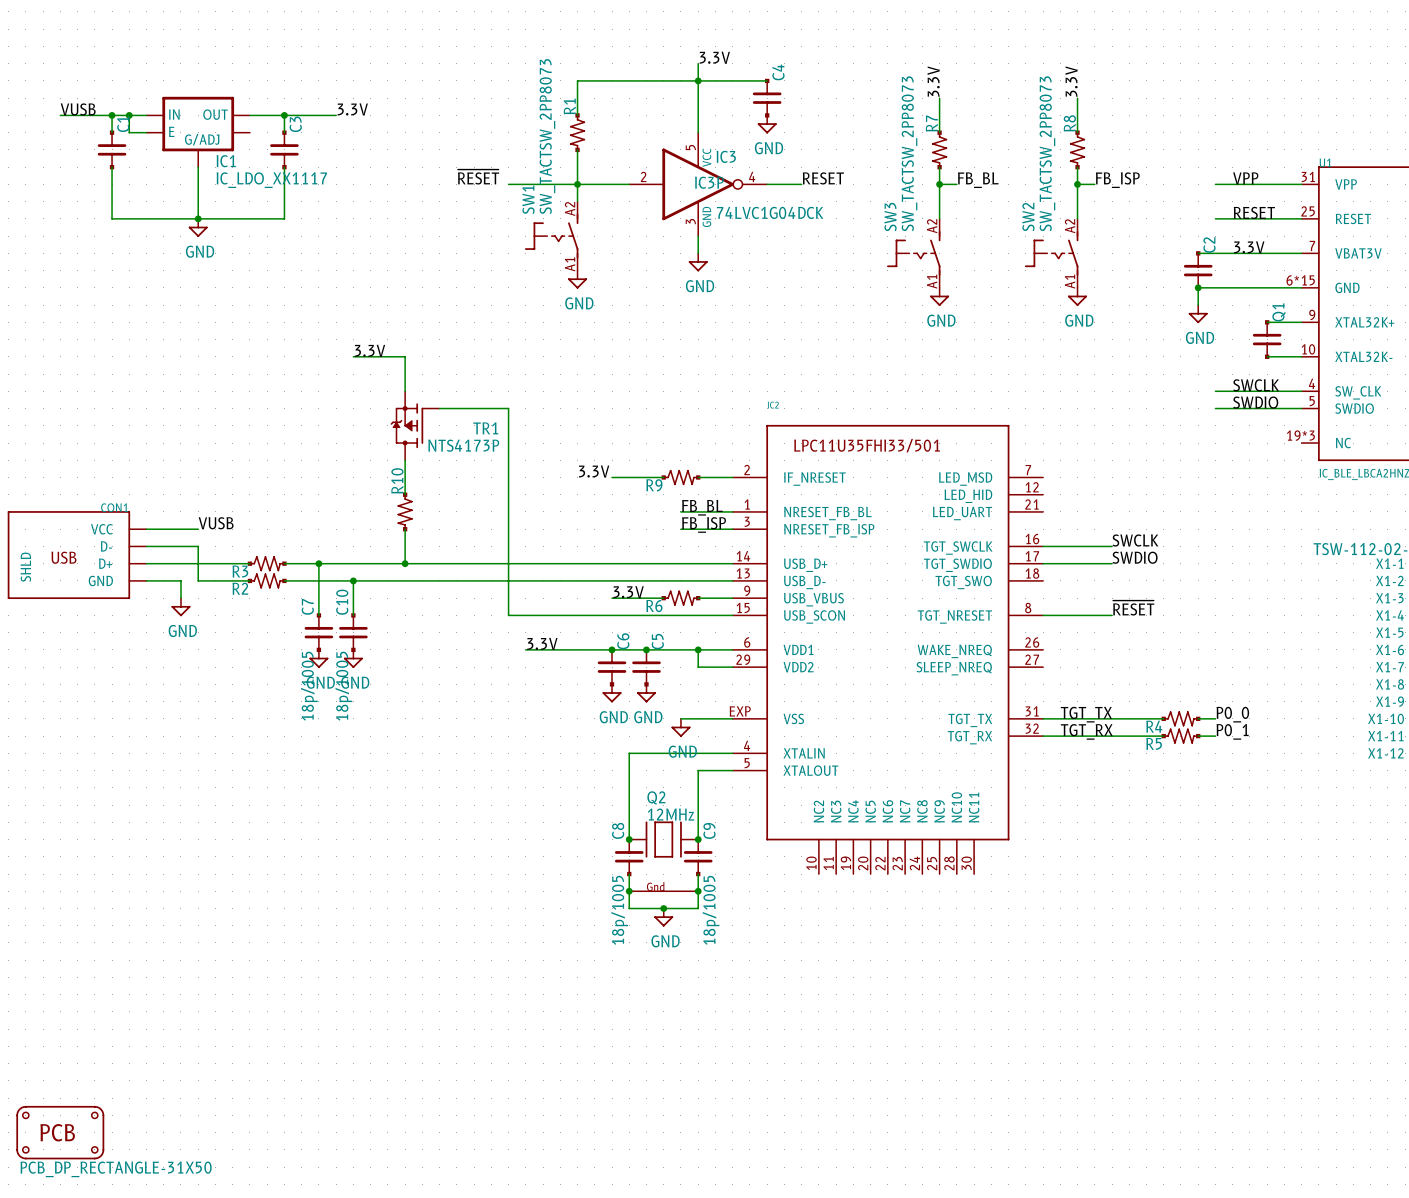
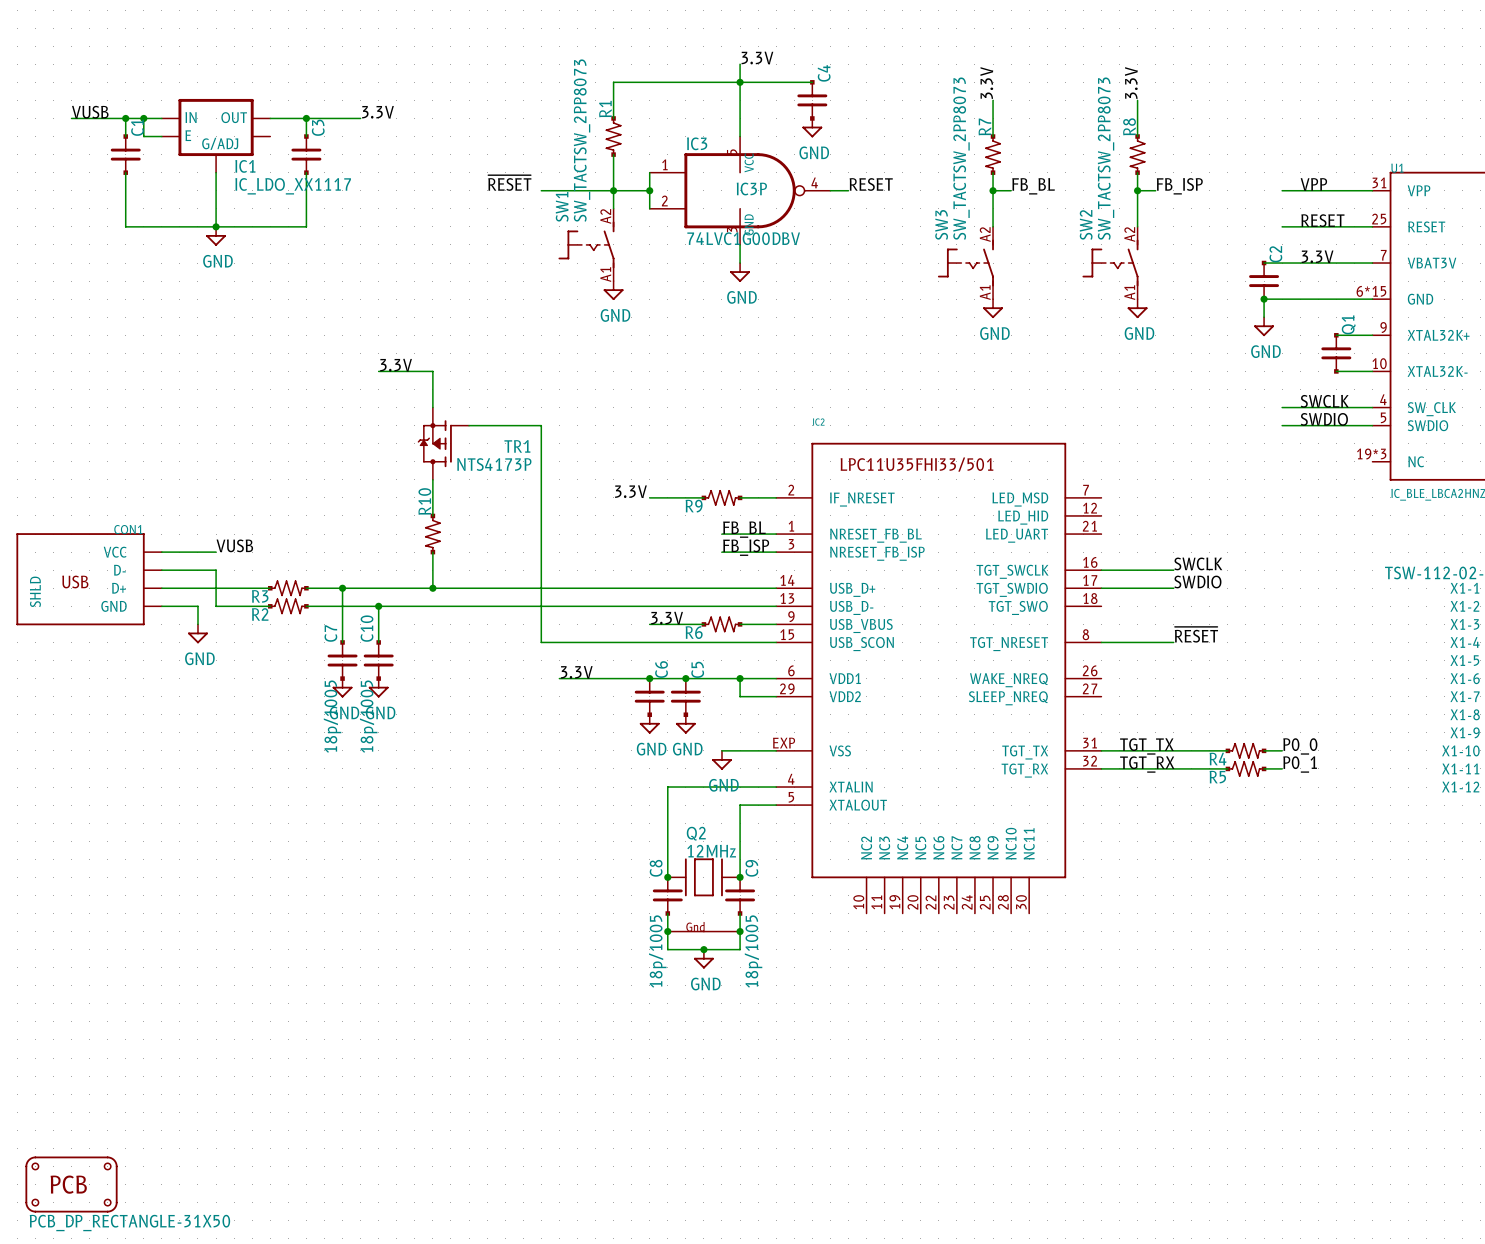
IC3 symbol: [629, 148, 768, 221] -> [649, 153, 831, 229]
IC3 name position: IC3 (726, 156) -> IC3 (697, 143)
wire: none -> (649, 172) (649, 208)
wire: (612, 184) (629, 184) -> none
junction: none -> (649, 190)
IC3 value: 74LVC1G04DCK (770, 212) -> 74LVC1G00DBV (743, 238)

